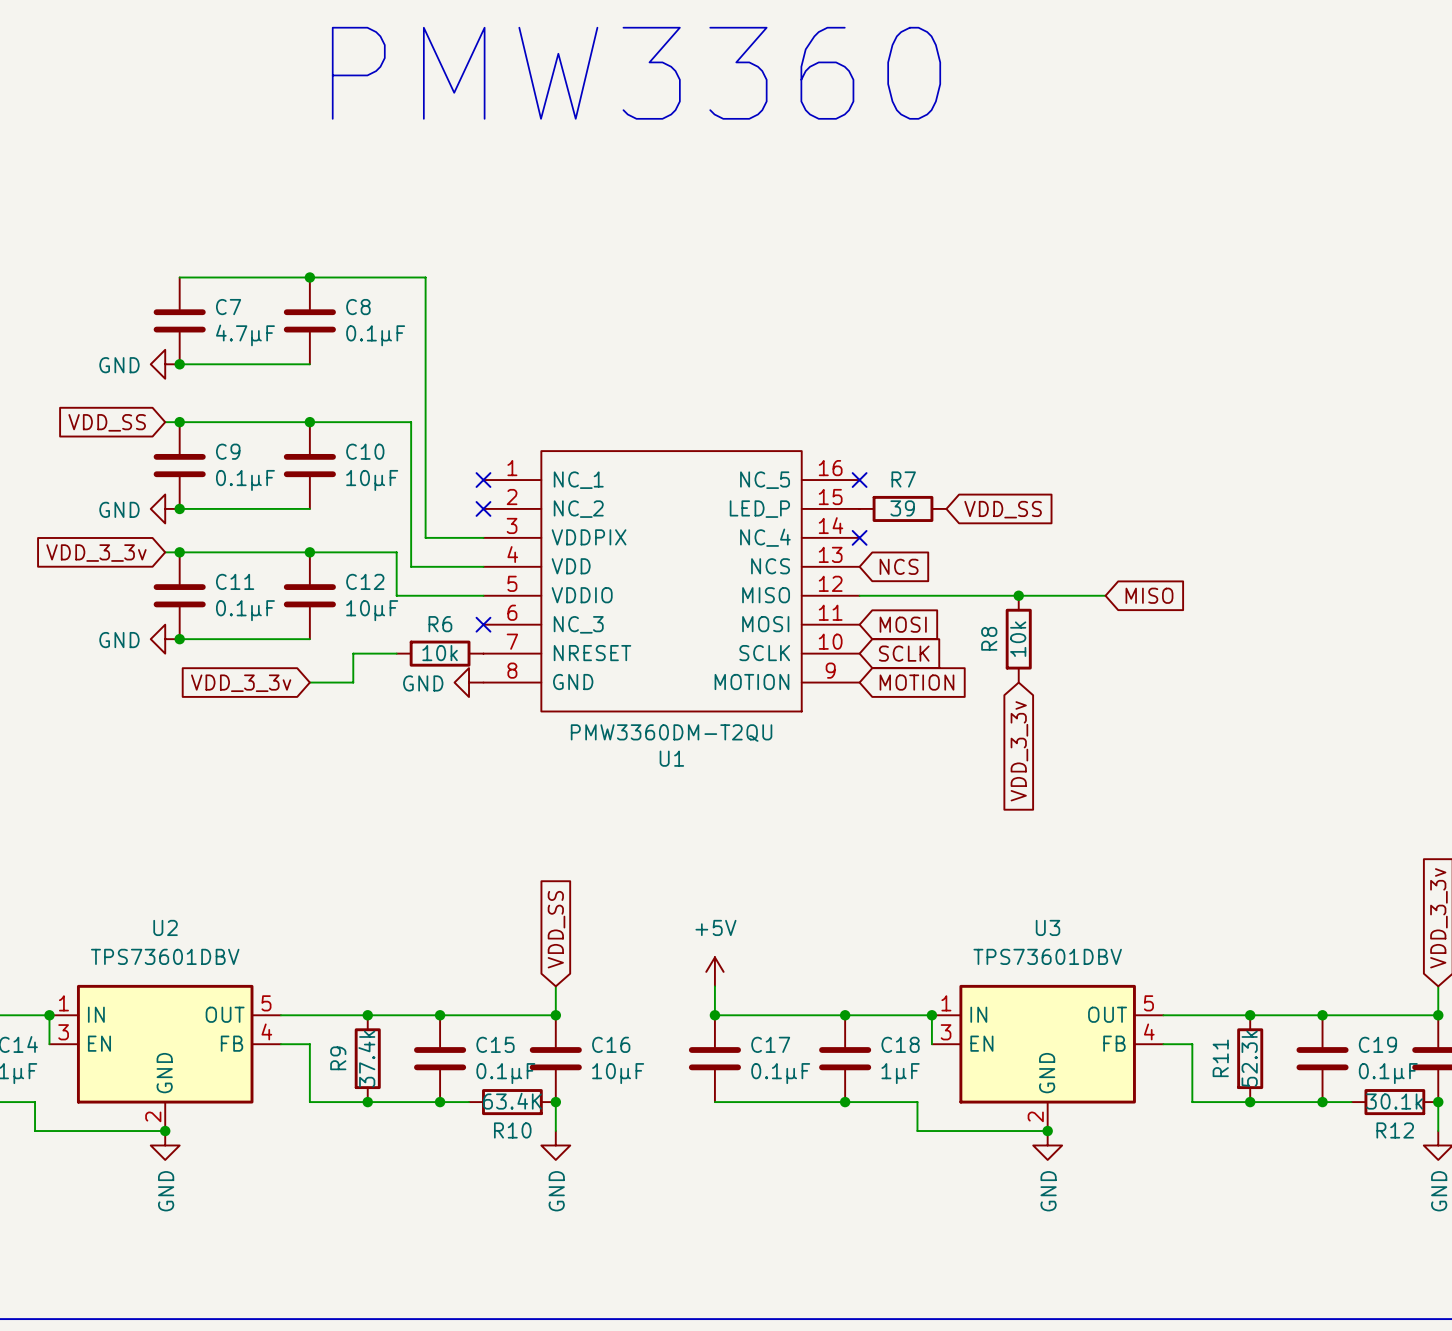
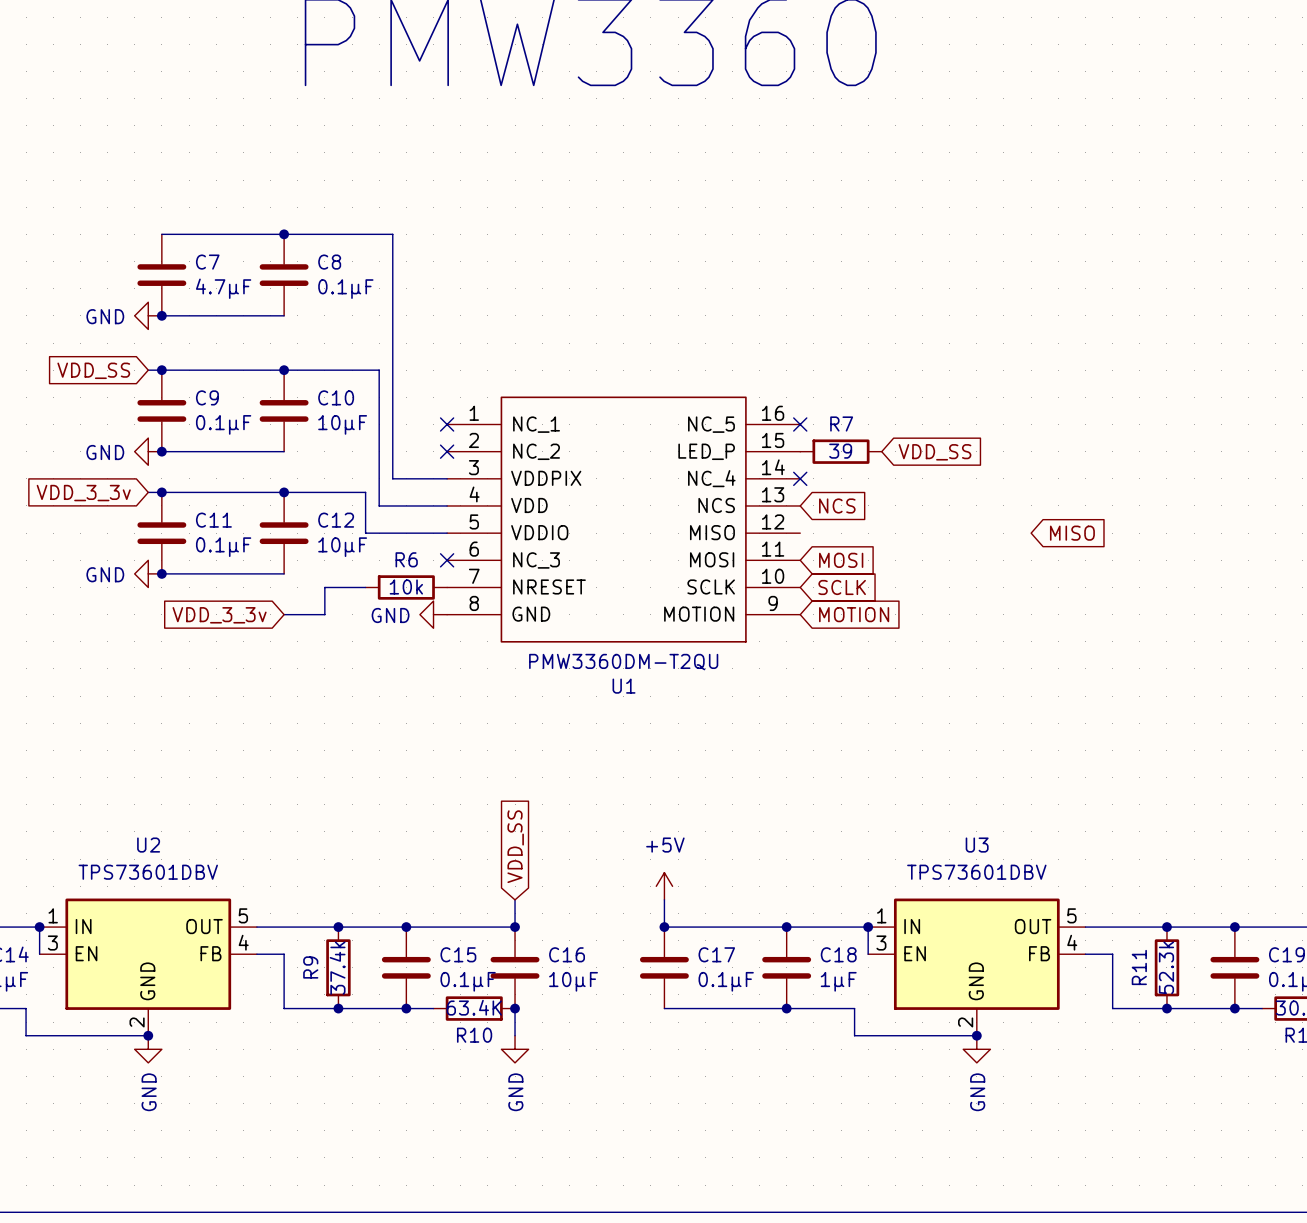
wire: (859, 595) (1105, 595) -> none
junction: (1018, 595) -> none
R8: 10k (1018, 639) -> none
global label: VDD_3_3v (1019, 751) -> none

